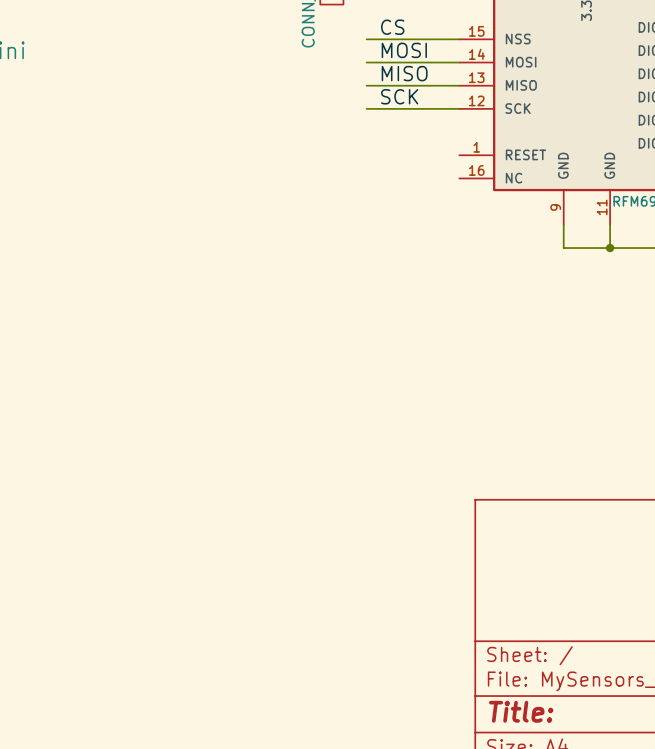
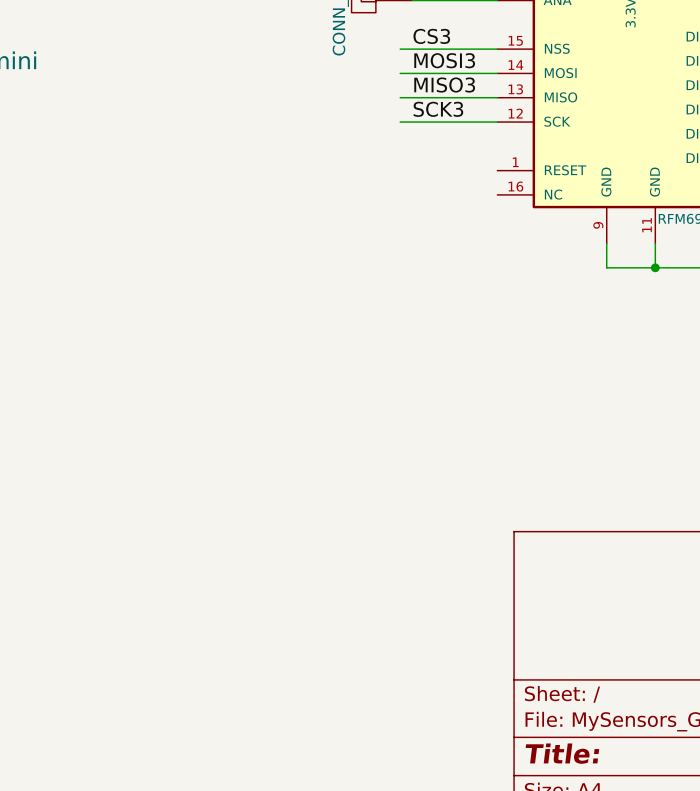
label: CS (392, 27) -> CS3 (431, 36)
label: MOSI (404, 50) -> MOSI3 (444, 60)
label: MISO (404, 73) -> MISO3 (444, 85)
label: SCK (399, 96) -> SCK3 (438, 109)

